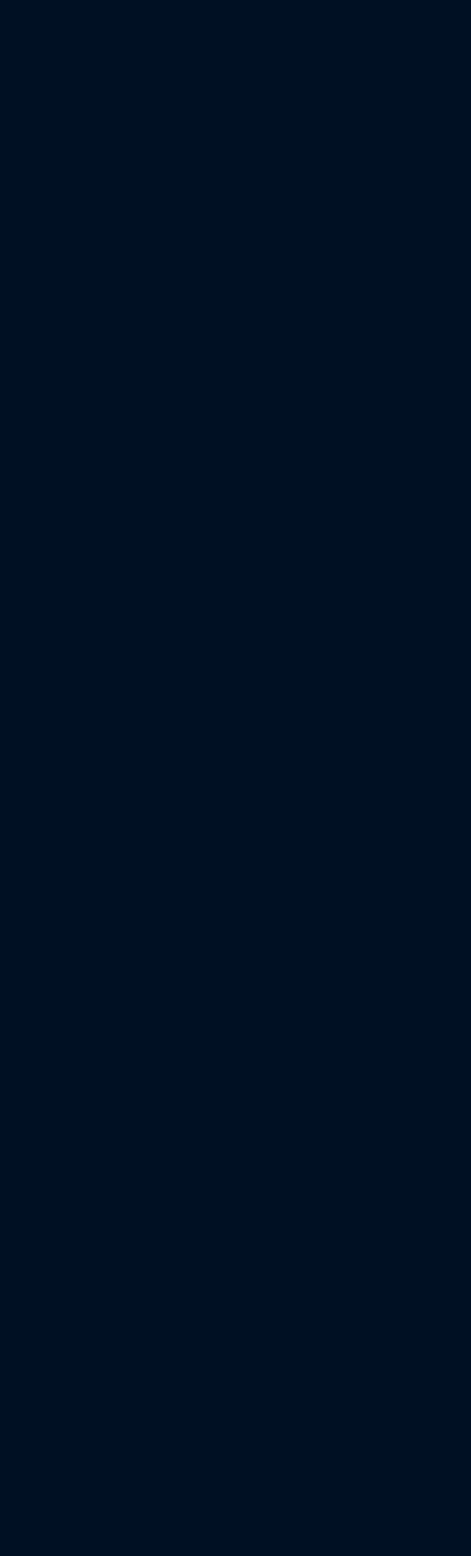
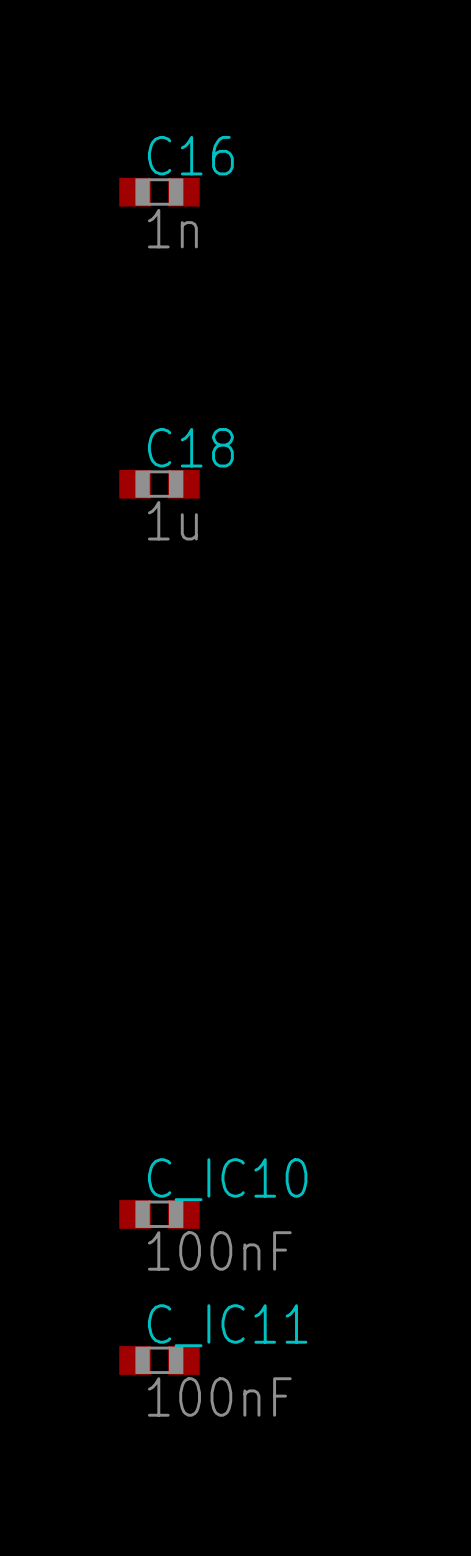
C16: none -> 1n (159, 192)
C18: none -> 1u (159, 484)
C_IC10: none -> 100nF (159, 1214)
C_IC11: none -> 100nF (159, 1360)

